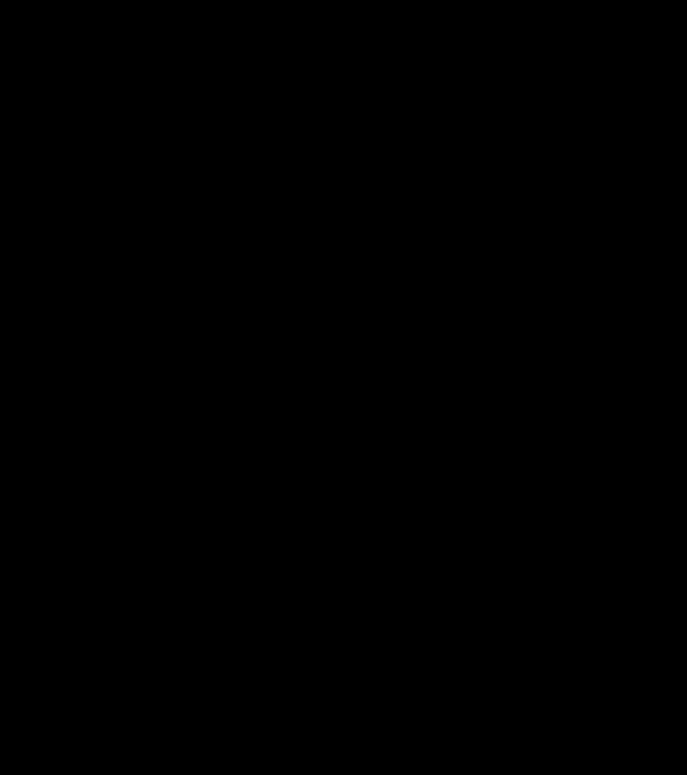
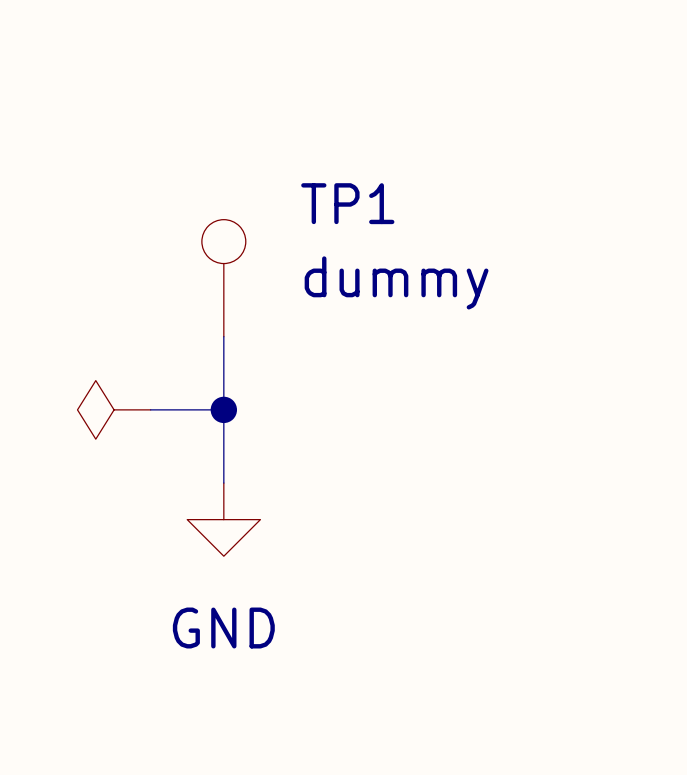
TP1: none -> dummy (223, 278)
wire: none -> (223, 336) (223, 483)
power symbol: none -> (114, 409)
wire: none -> (150, 409) (223, 409)
junction: none -> (223, 409)
power symbol: none -> GND (223, 519)

